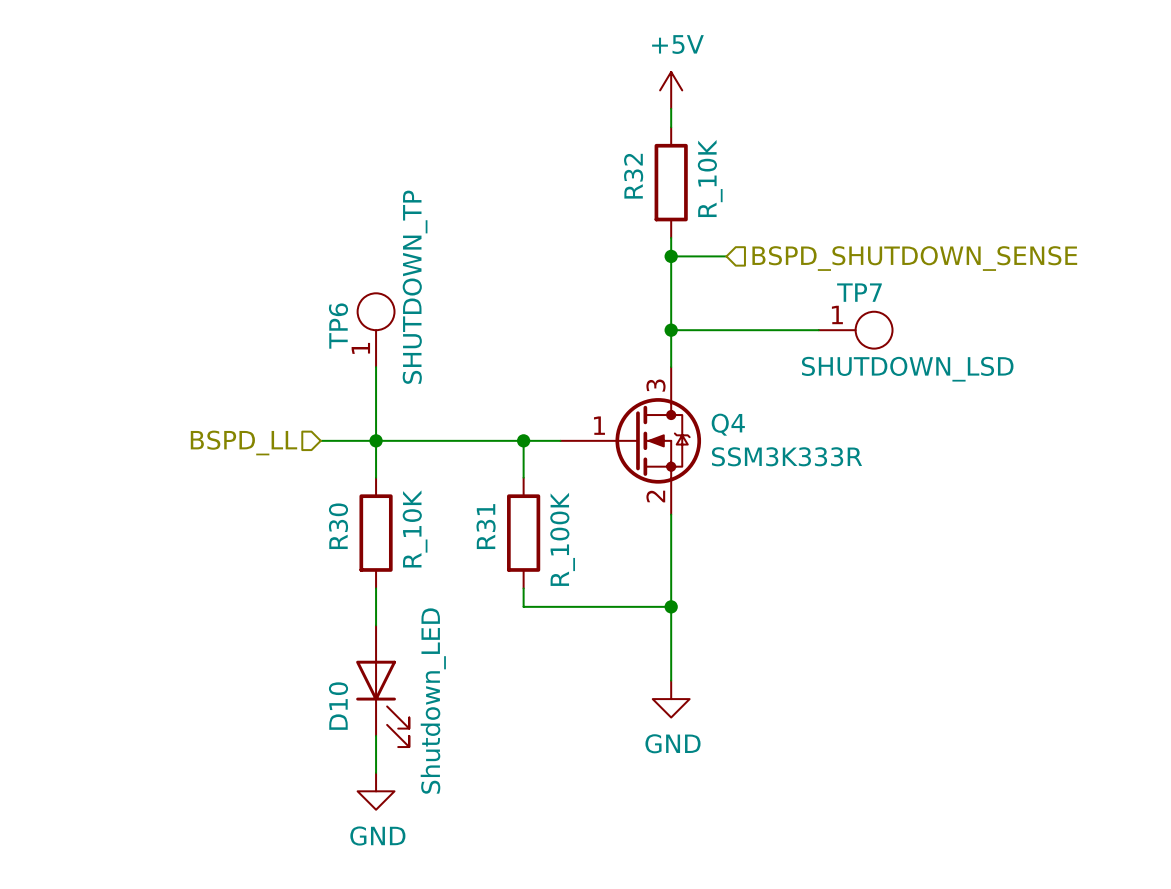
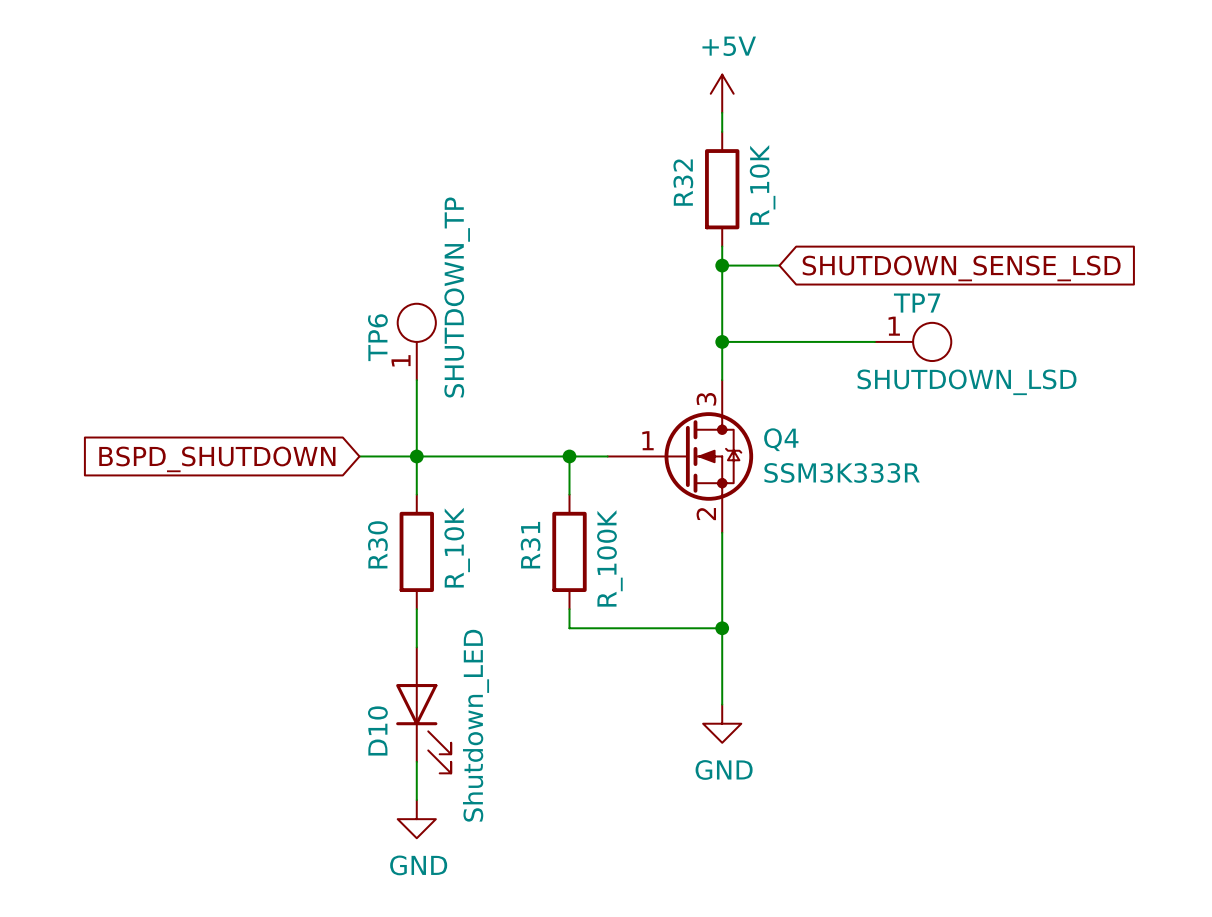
hierarchical label: BSPD_SHUTDOWN_SENSE (914, 258) -> none
global label: none -> SHUTDOWN_SENSE_LSD (961, 268)
hierarchical label: BSPD_LL (243, 442) -> none
global label: none -> BSPD_SHUTDOWN (217, 459)

